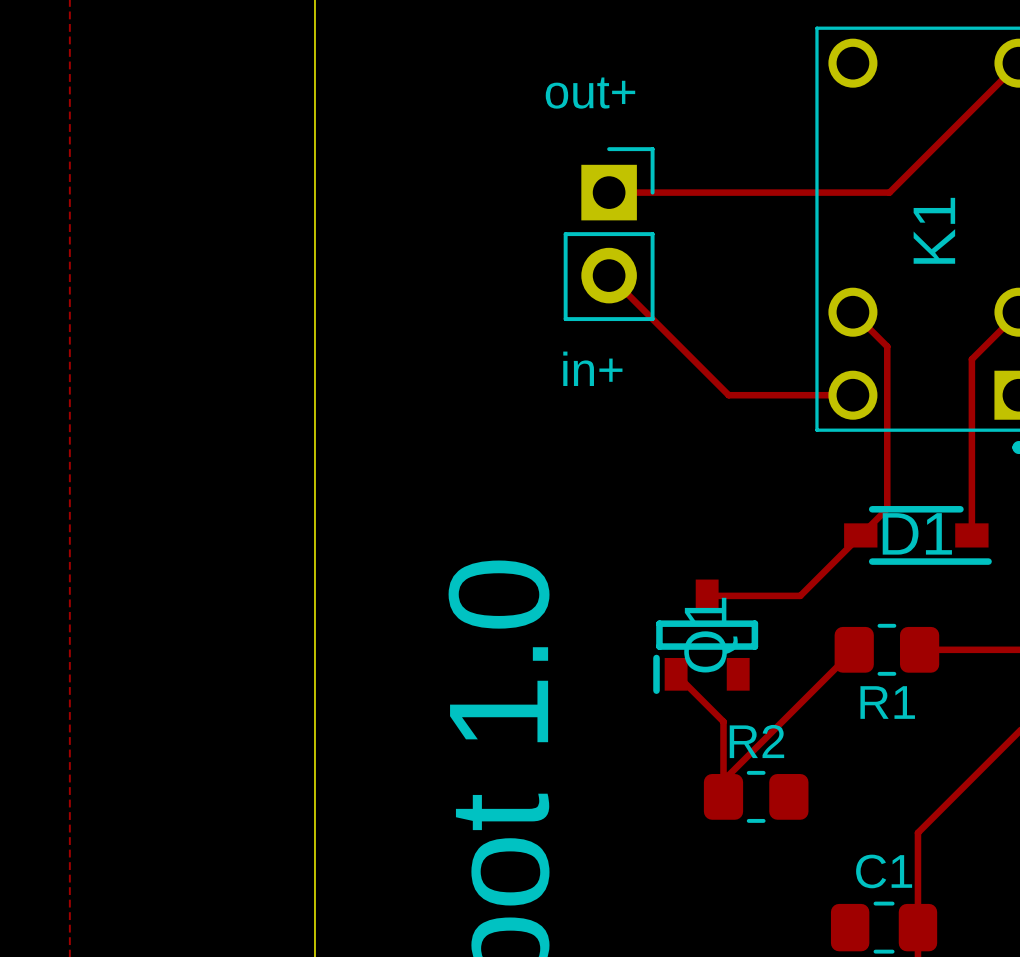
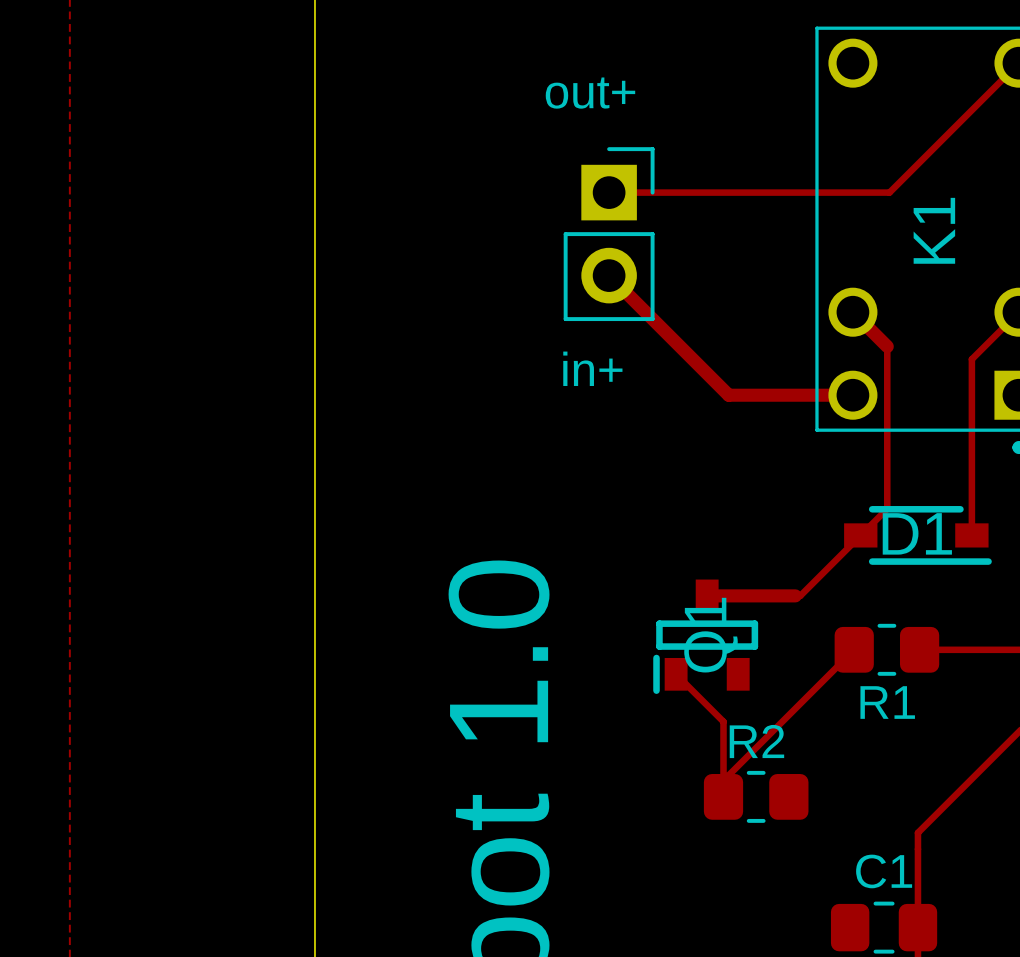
track width: thin (609, 275) (728, 395) (852, 395) -> thick (609, 275) (728, 395) (852, 395)
track width: thin (852, 312) (887, 346) -> thick (852, 312) (887, 346)
track width: thin (707, 595) (795, 595) -> thick (707, 595) (795, 595)

